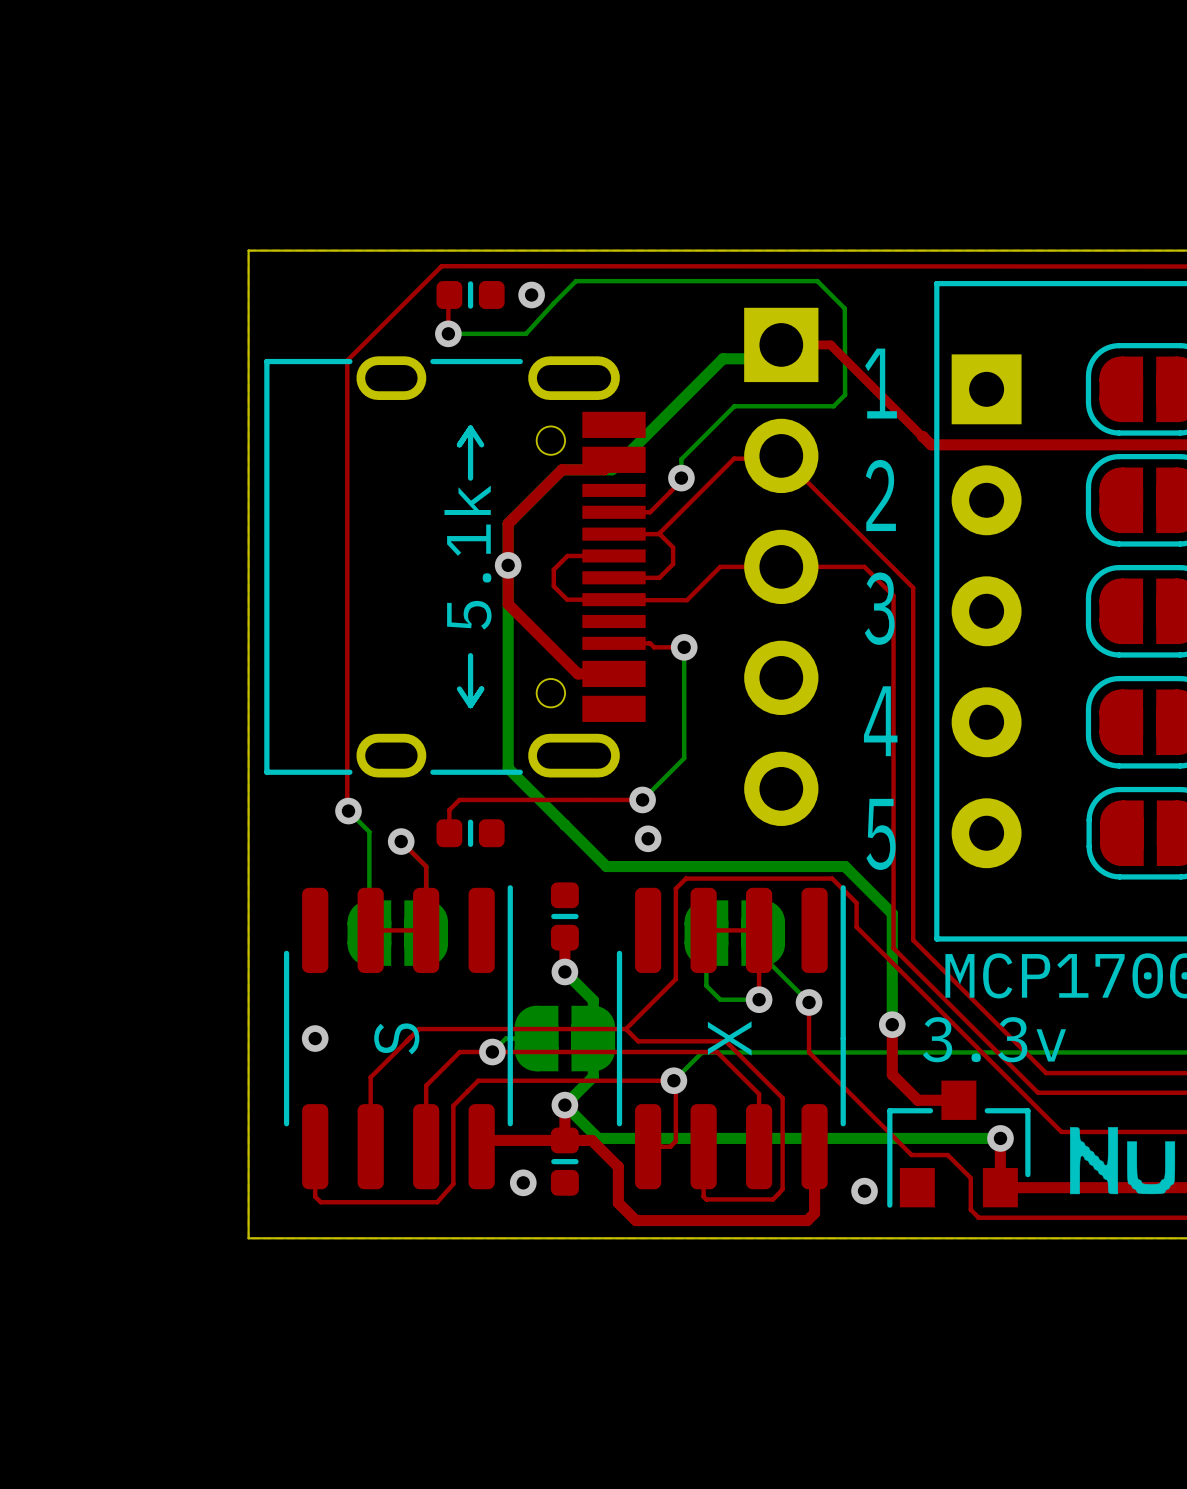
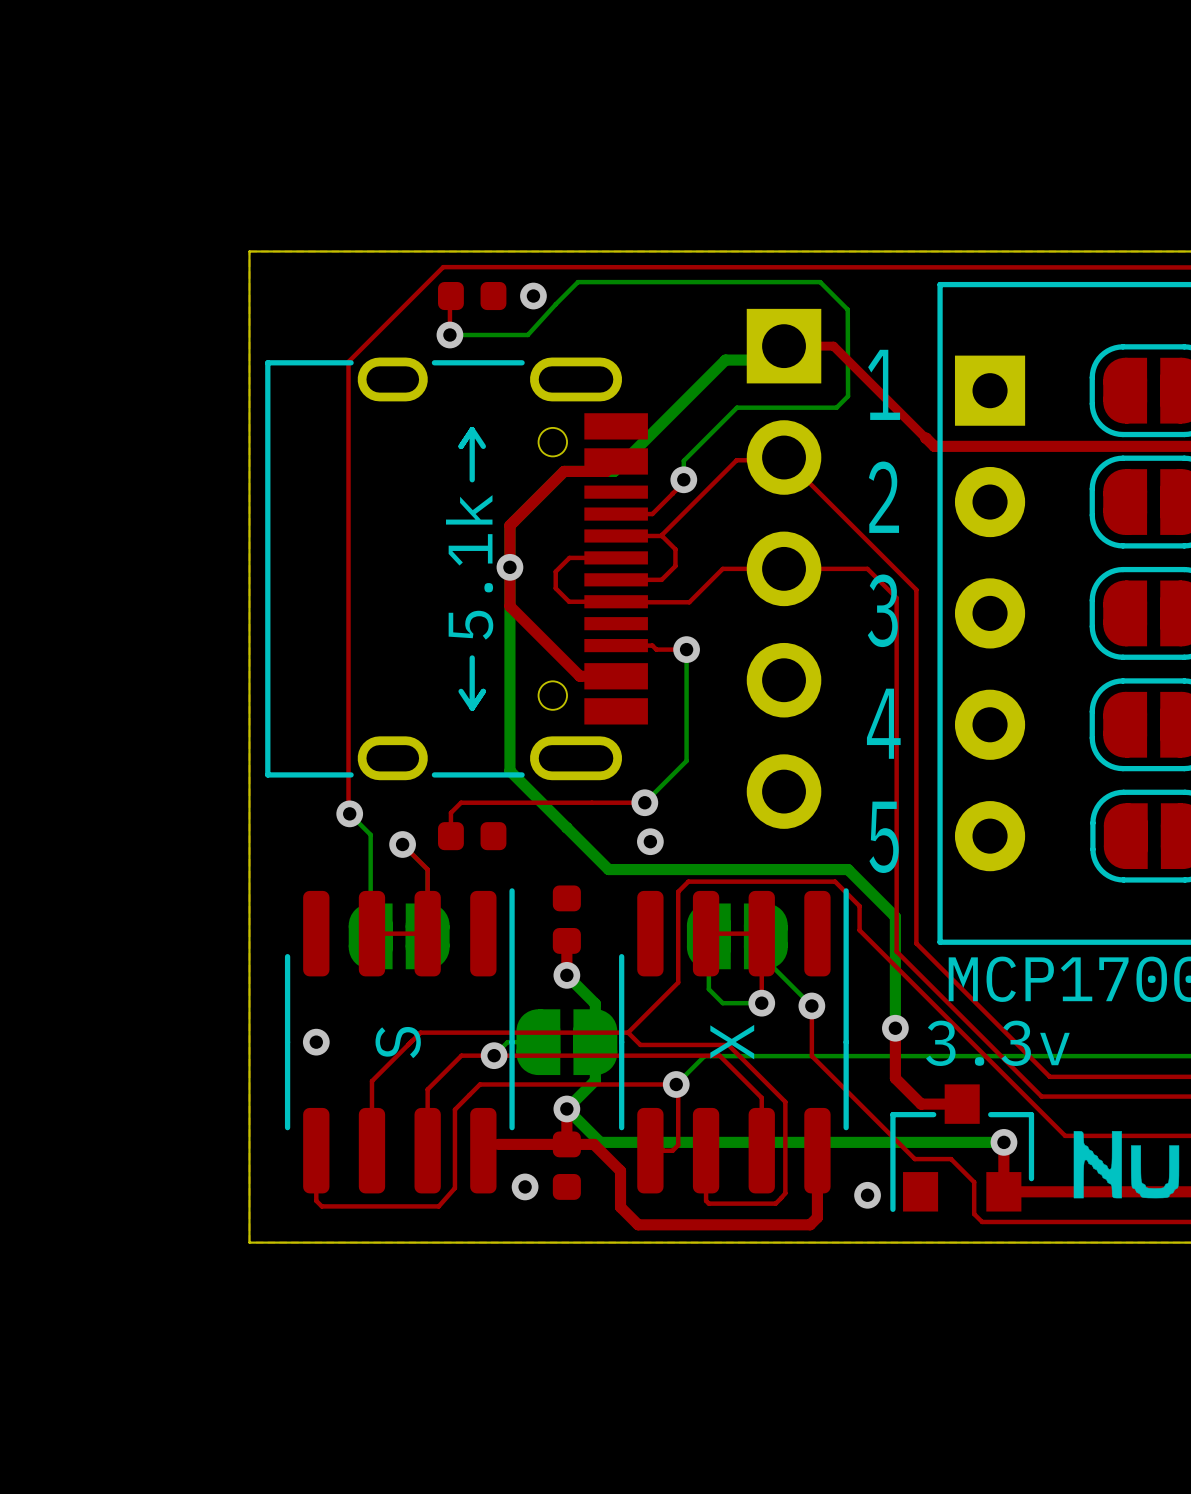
part footprint: [436, 281, 505, 309] -> [438, 281, 507, 311]
part footprint: [436, 819, 505, 848] -> [438, 822, 507, 851]
part footprint: [550, 882, 579, 951] -> [552, 885, 581, 954]
part footprint: [550, 1127, 579, 1196] -> [552, 1131, 581, 1200]

